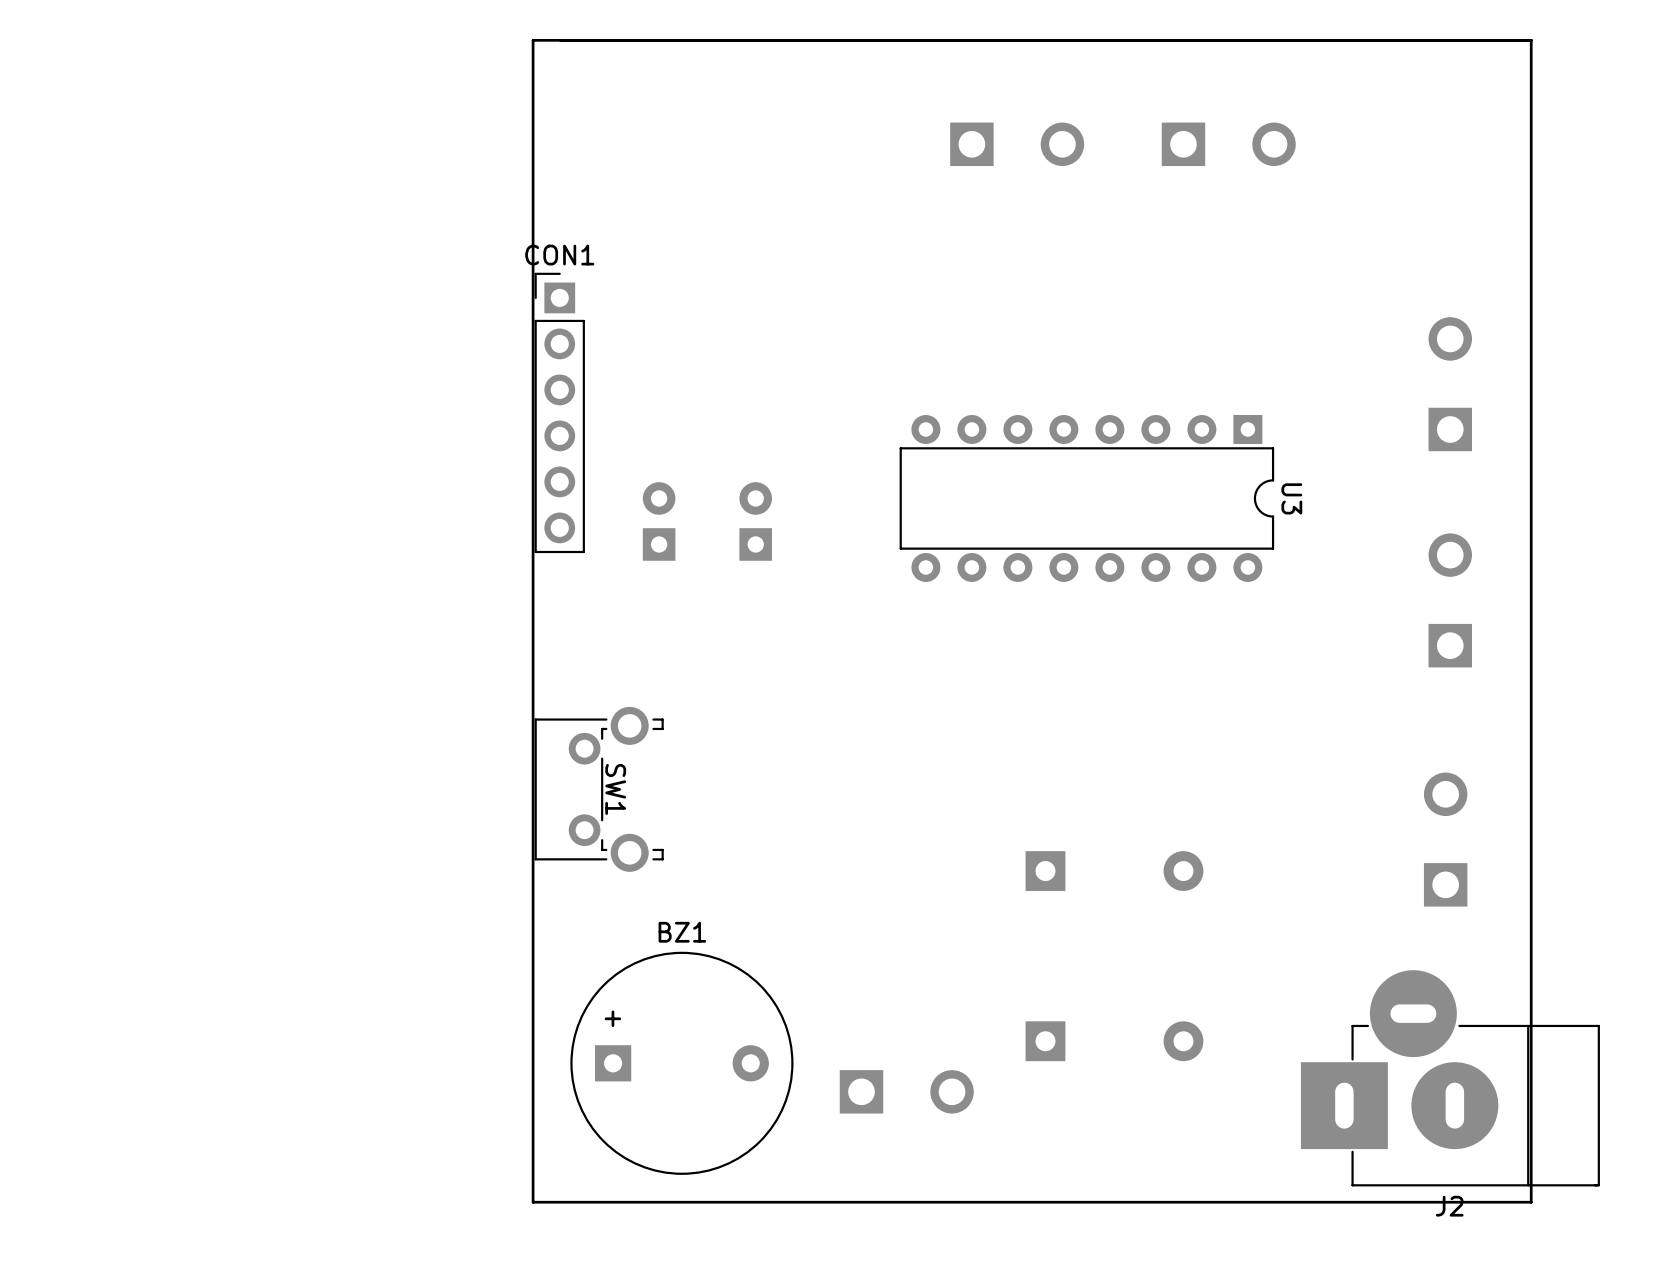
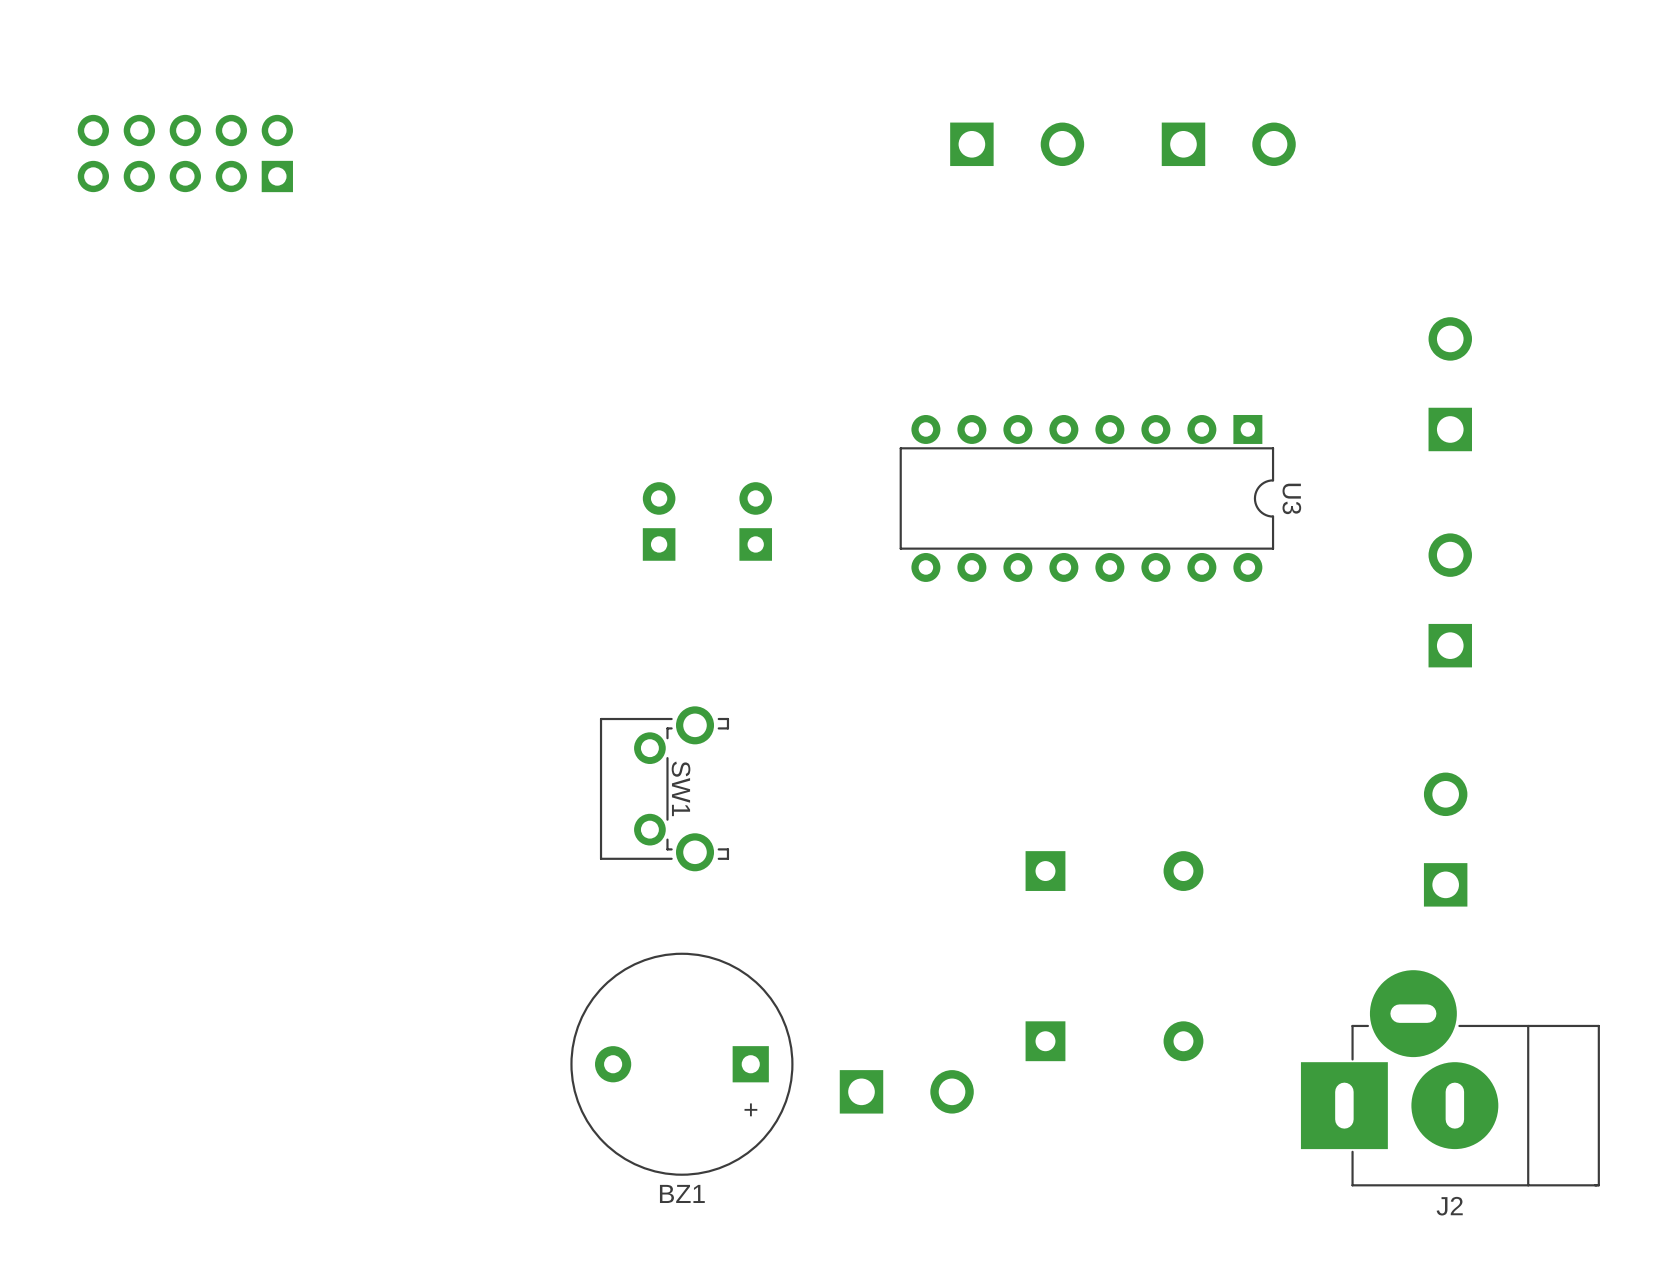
board edge: (1531, 40) (533, 40) (533, 1202) (1531, 1202) (1531, 40) -> none
part: none -> (185, 153)
CON1: (559, 412) -> none
SW1 position: (599, 789) -> (664, 788)
BZ1 rotation: 0° (681, 1063) -> 180° (681, 1064)

